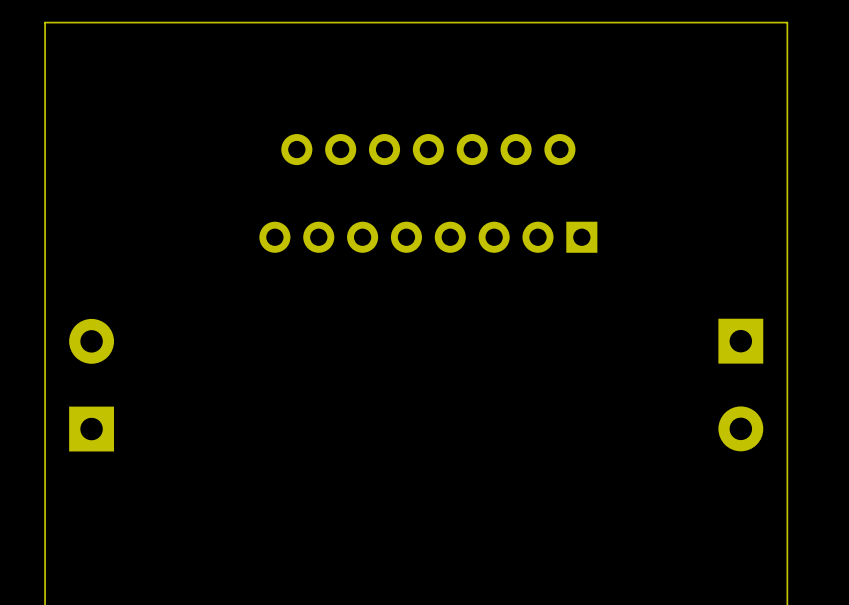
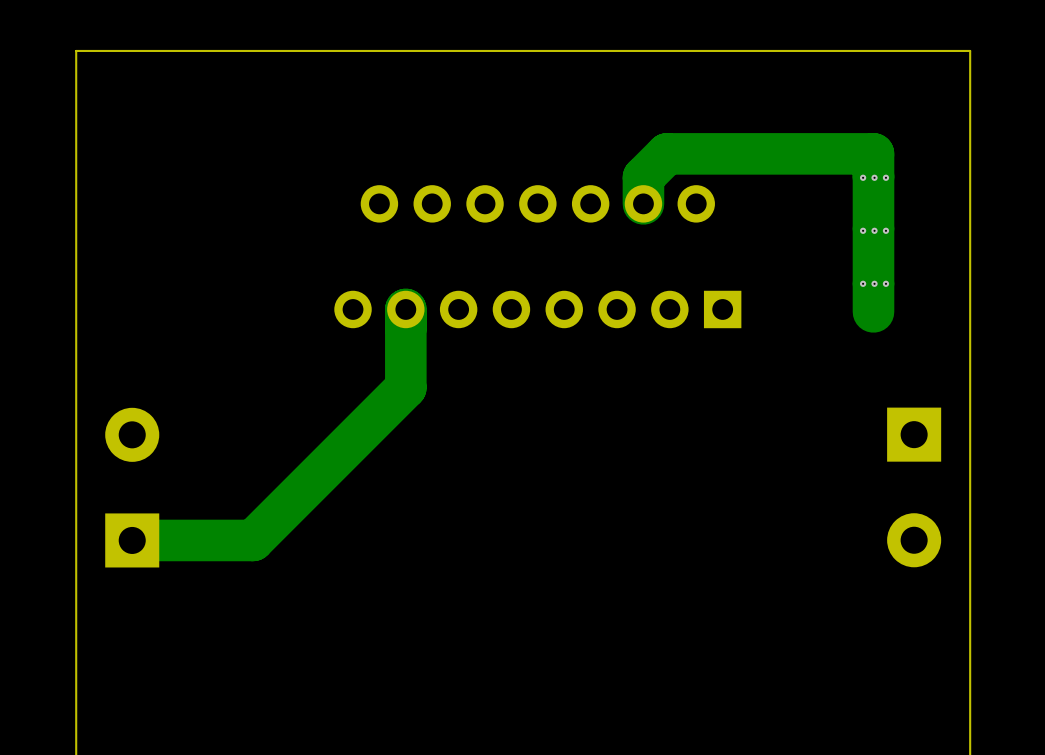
via: none -> (863, 177)
via: none -> (874, 177)
via: none -> (885, 177)
track: none -> (643, 203) (643, 177) (666, 153) (873, 153) (873, 311)
via: none -> (863, 230)
via: none -> (874, 230)
via: none -> (885, 230)
via: none -> (863, 283)
via: none -> (874, 283)
via: none -> (885, 283)
track: none -> (405, 309) (405, 387) (253, 540) (132, 540)

